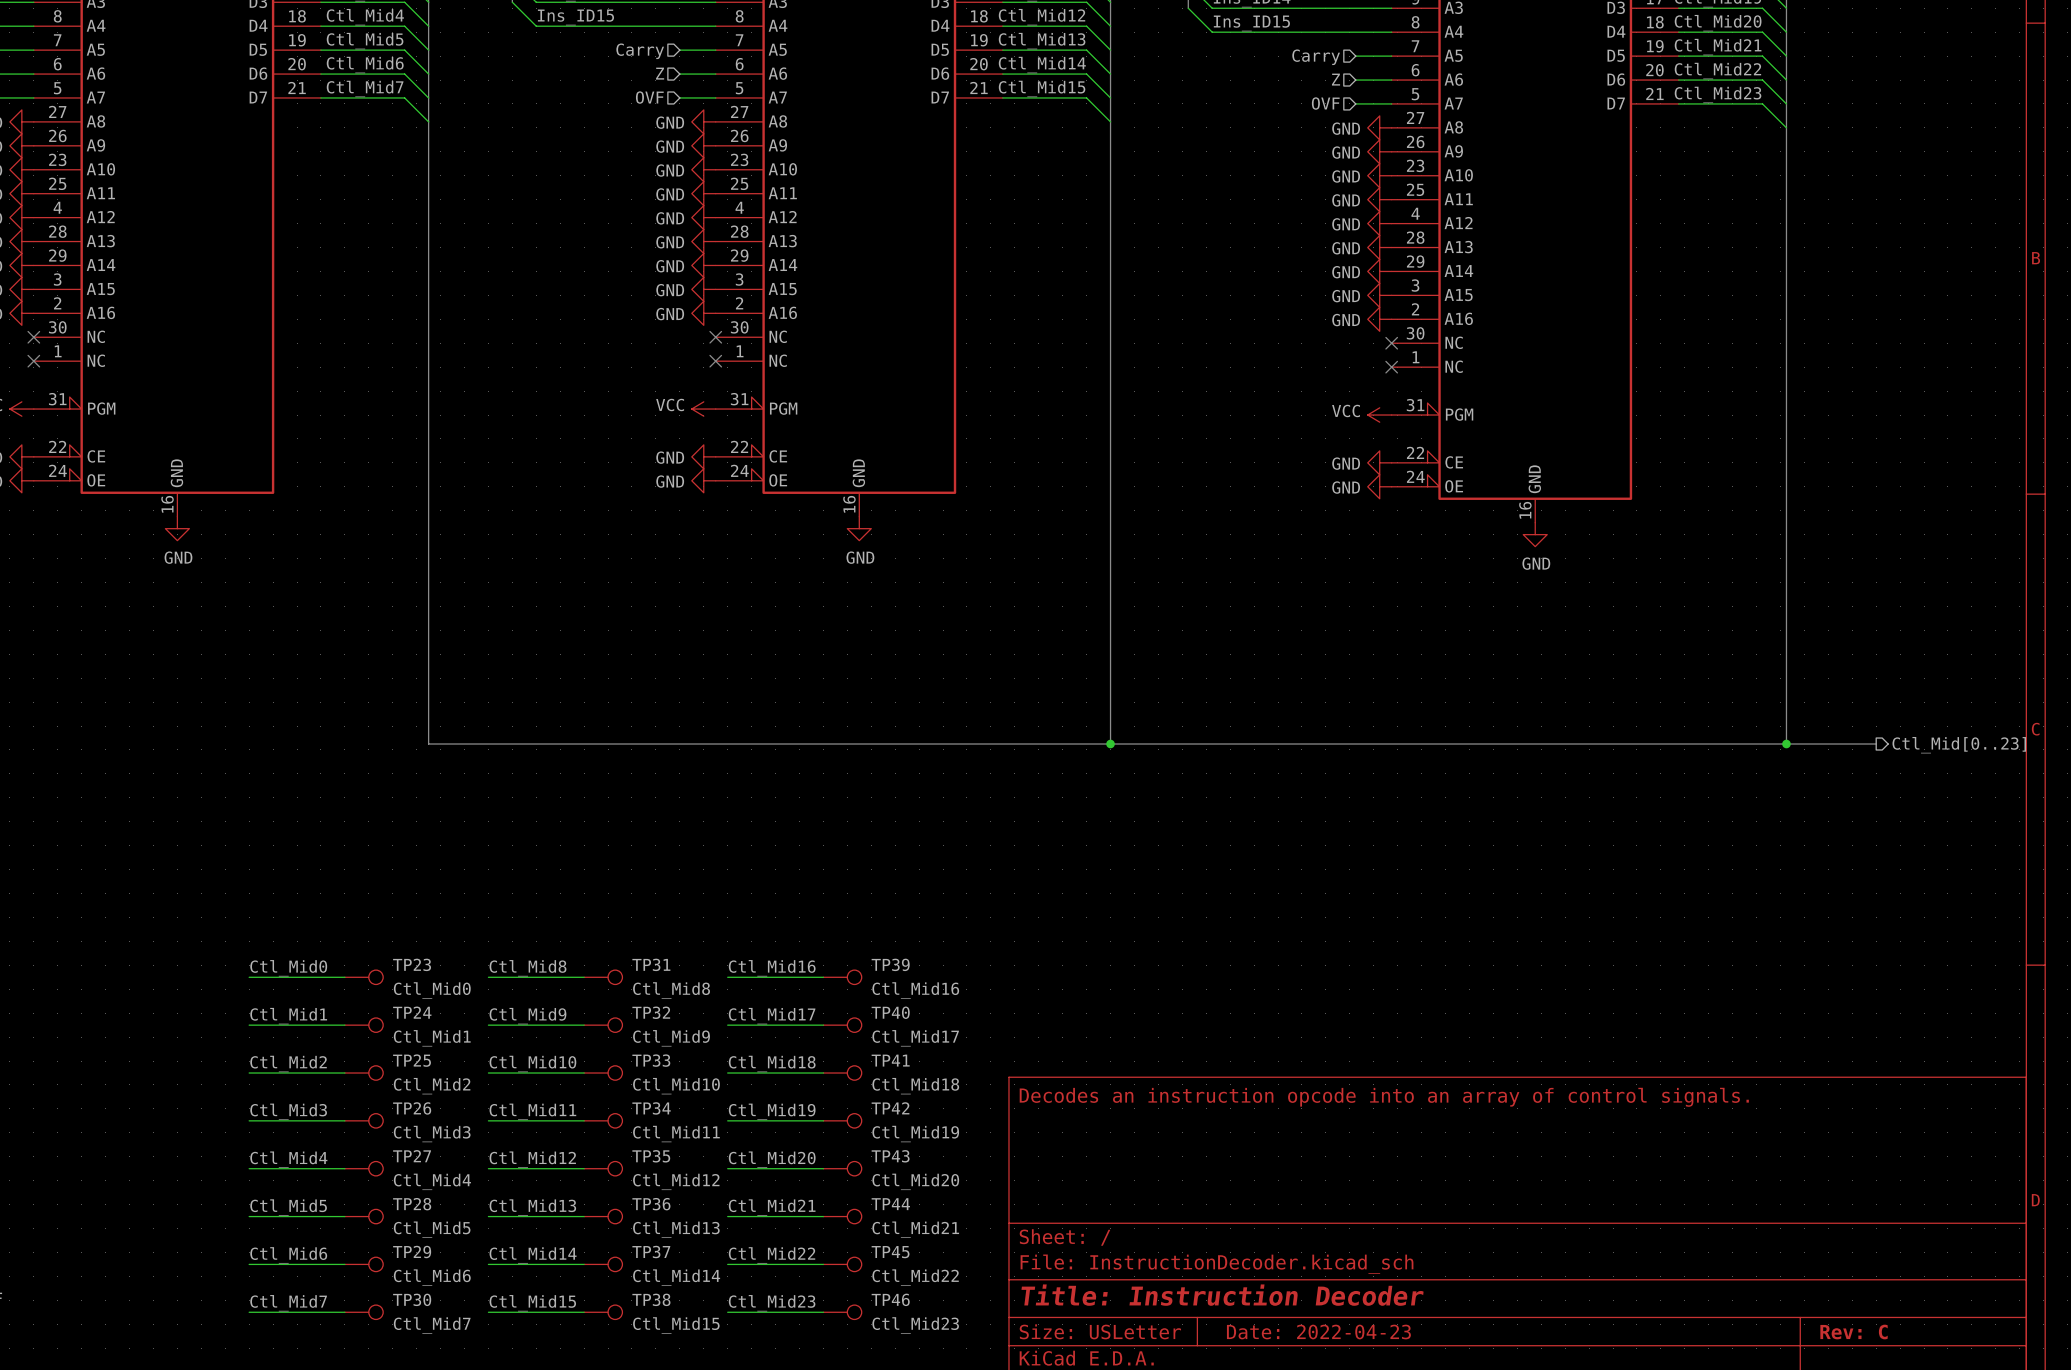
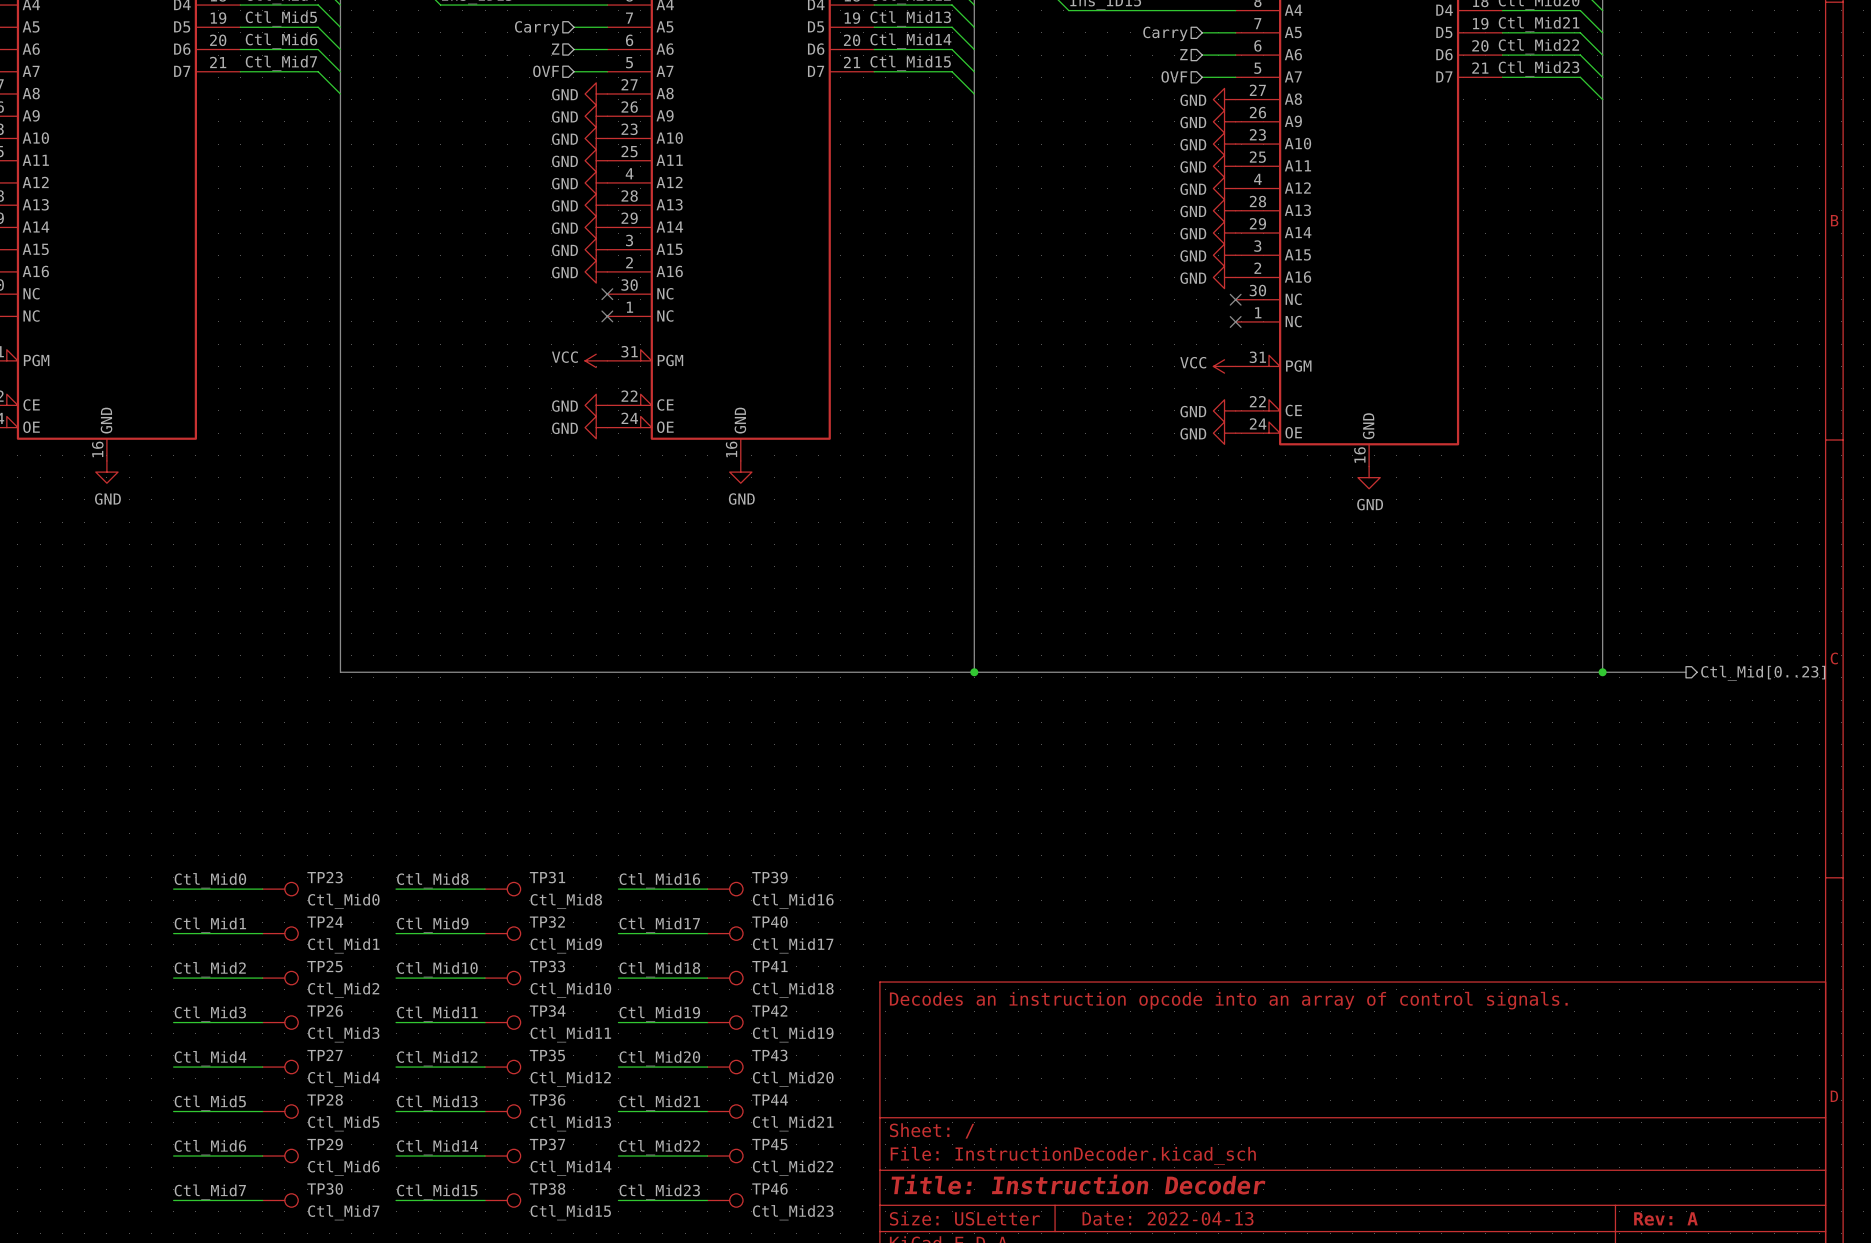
title block: Date: 2022-04-23 (1318, 1332) -> Date: 2022-04-13 (1168, 1218)
title block: Rev: C (1854, 1332) -> Rev: A (1665, 1218)

